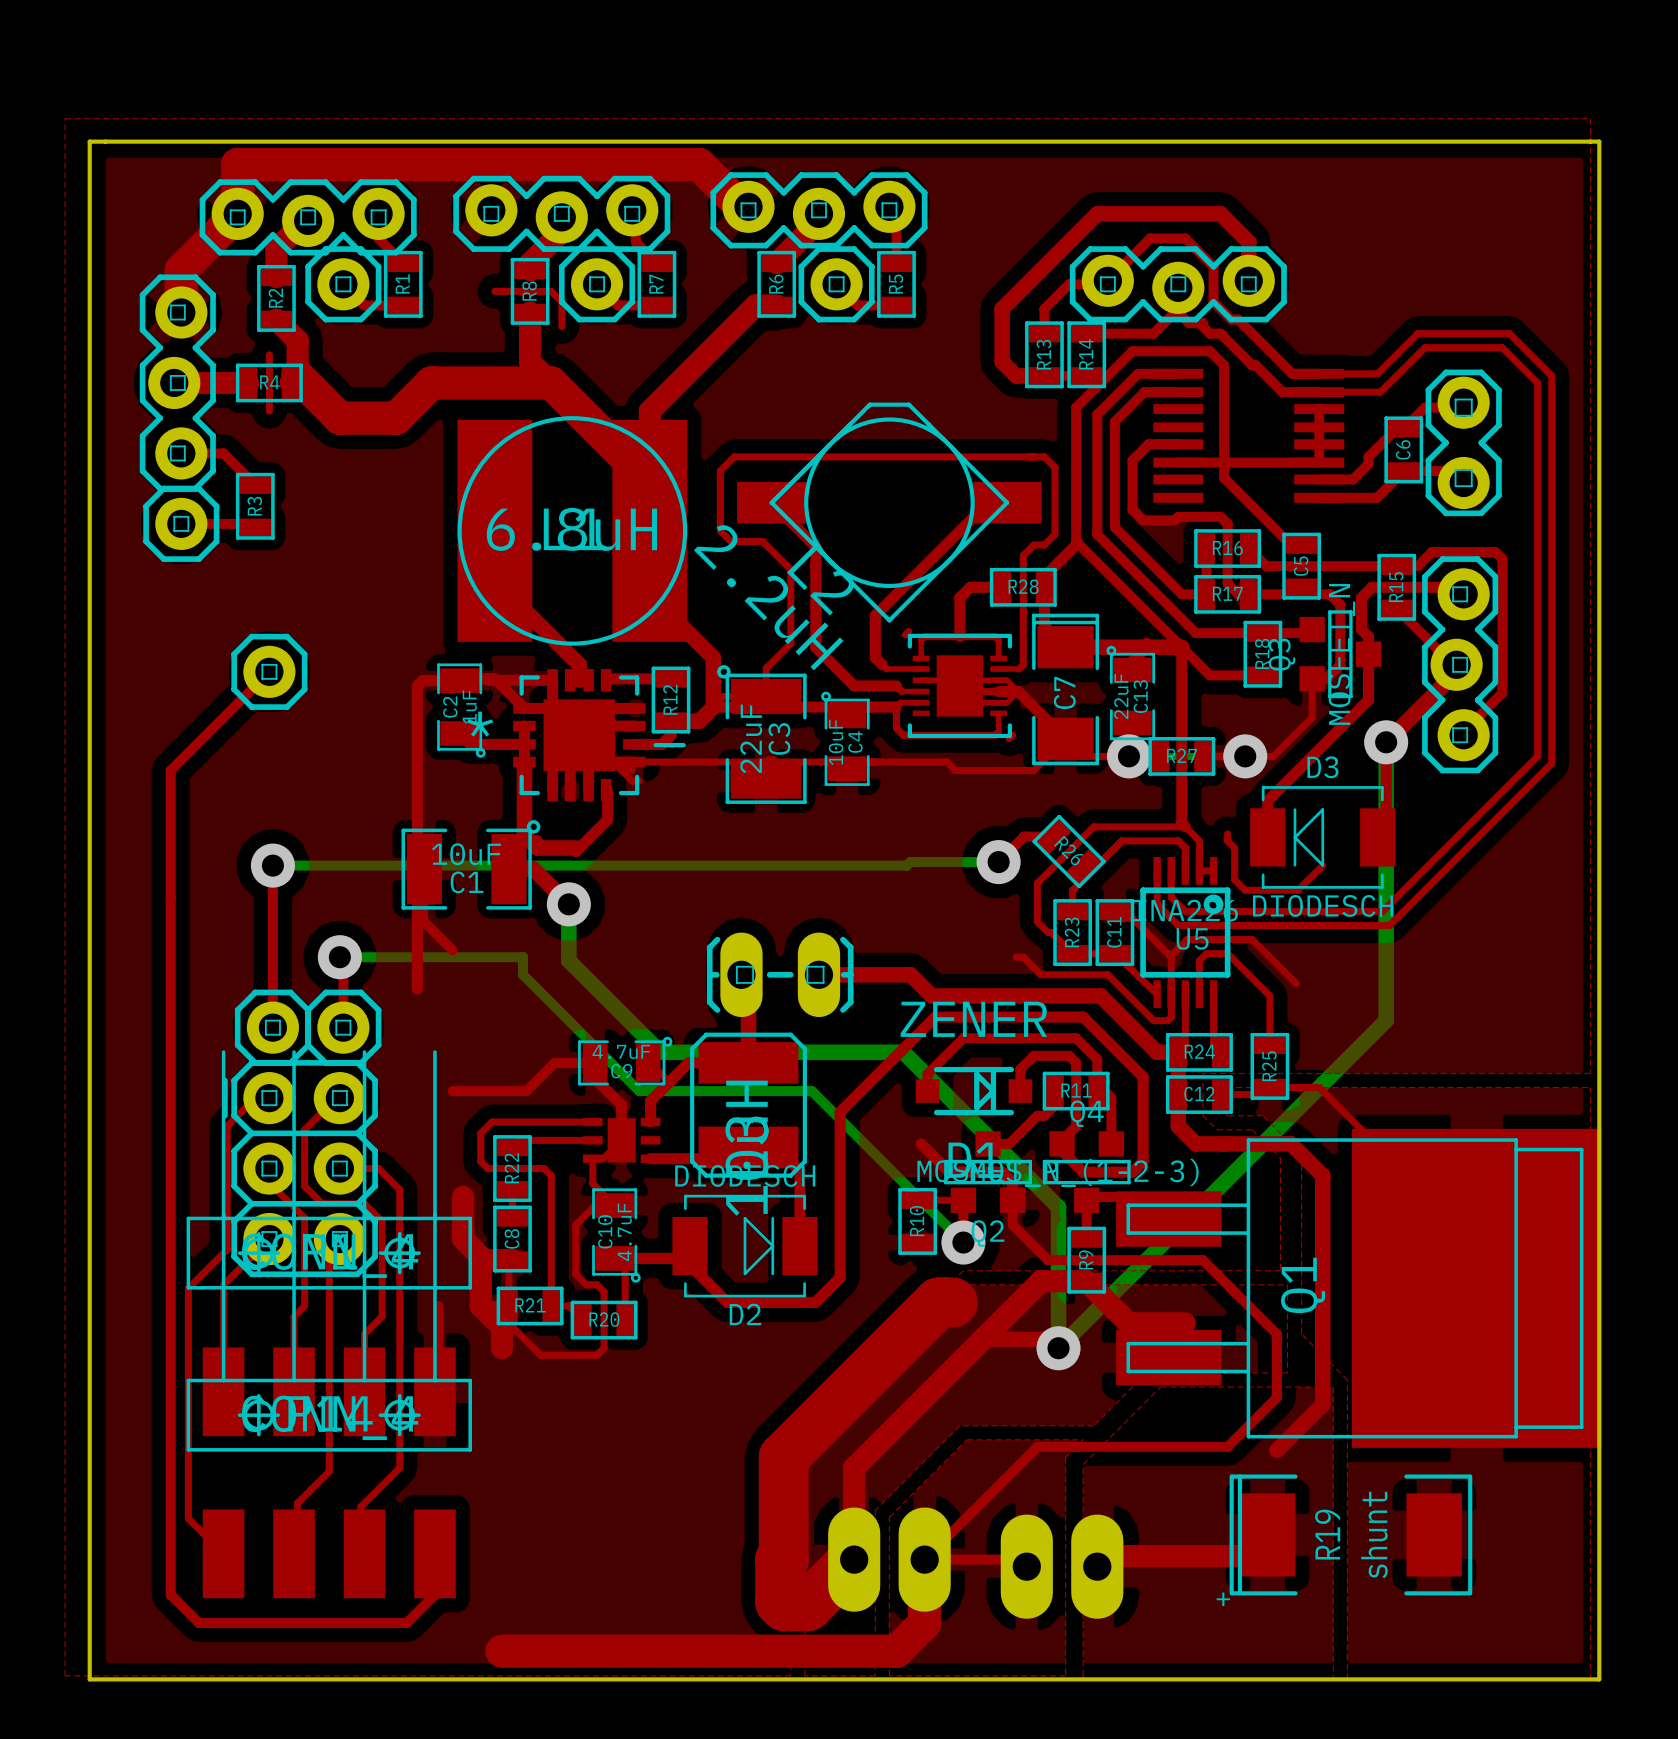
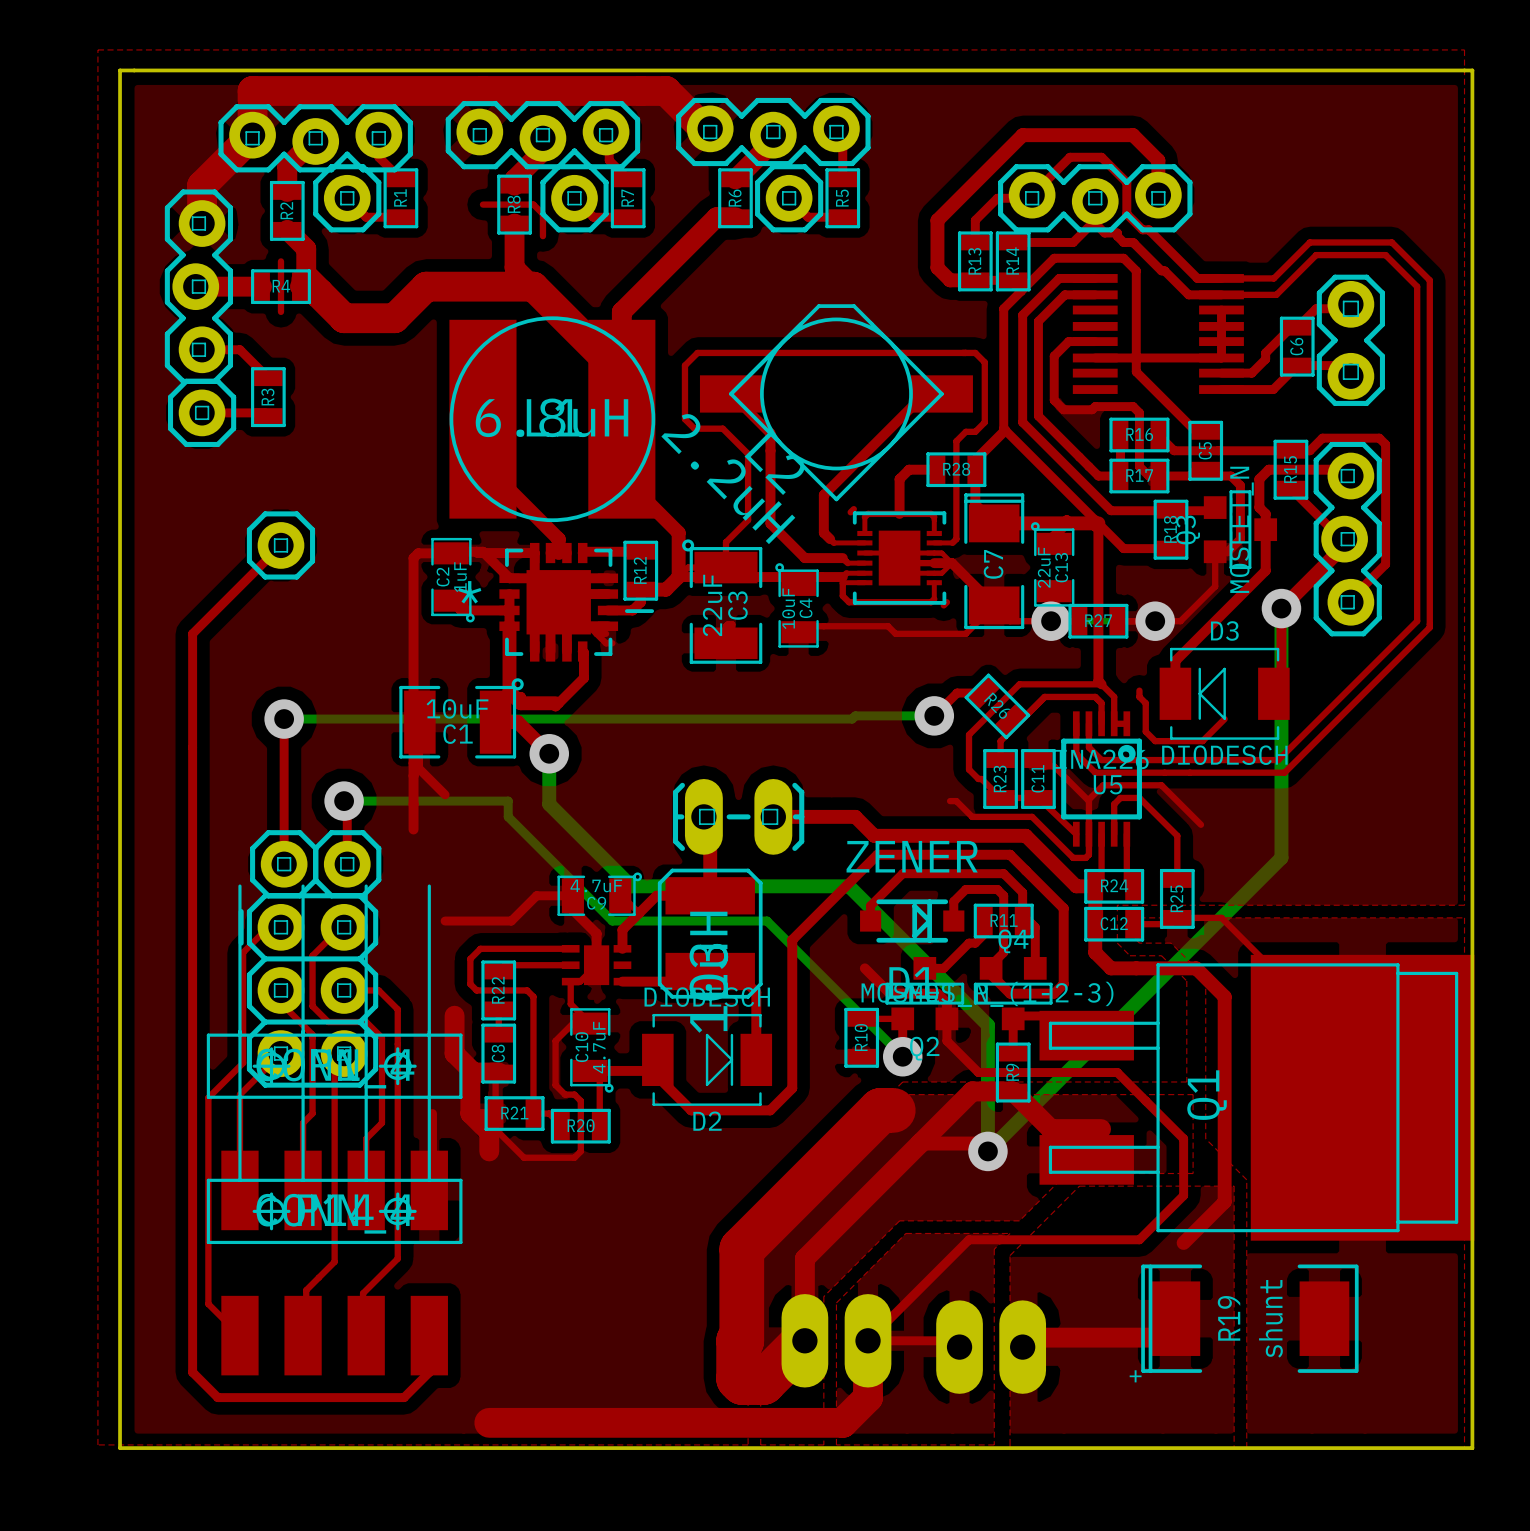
top track: none -> (864, 582) (842, 583)
top track: (634, 762) (853, 762) -> none

